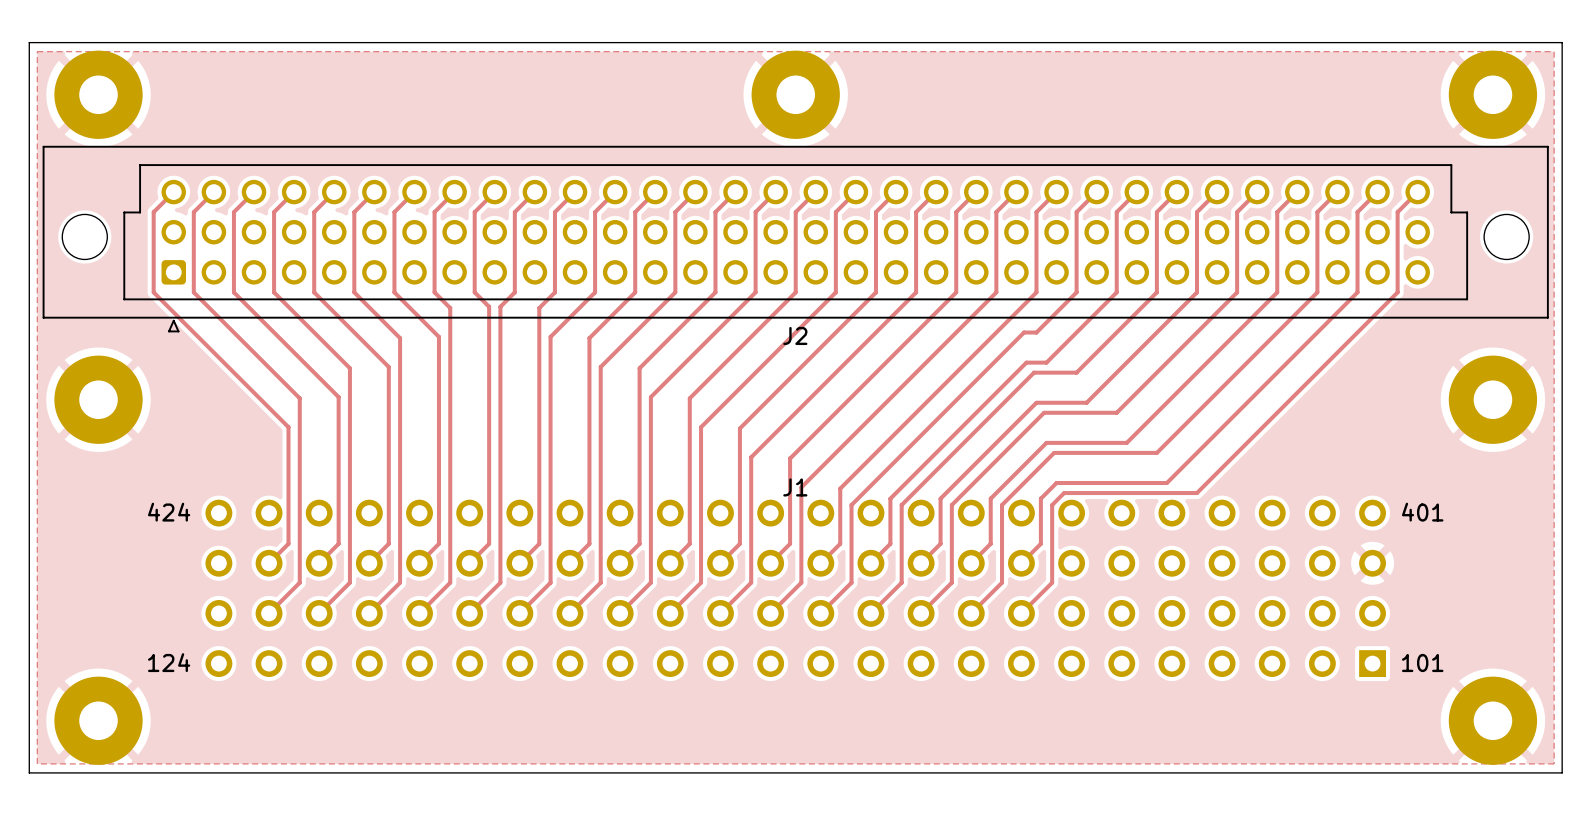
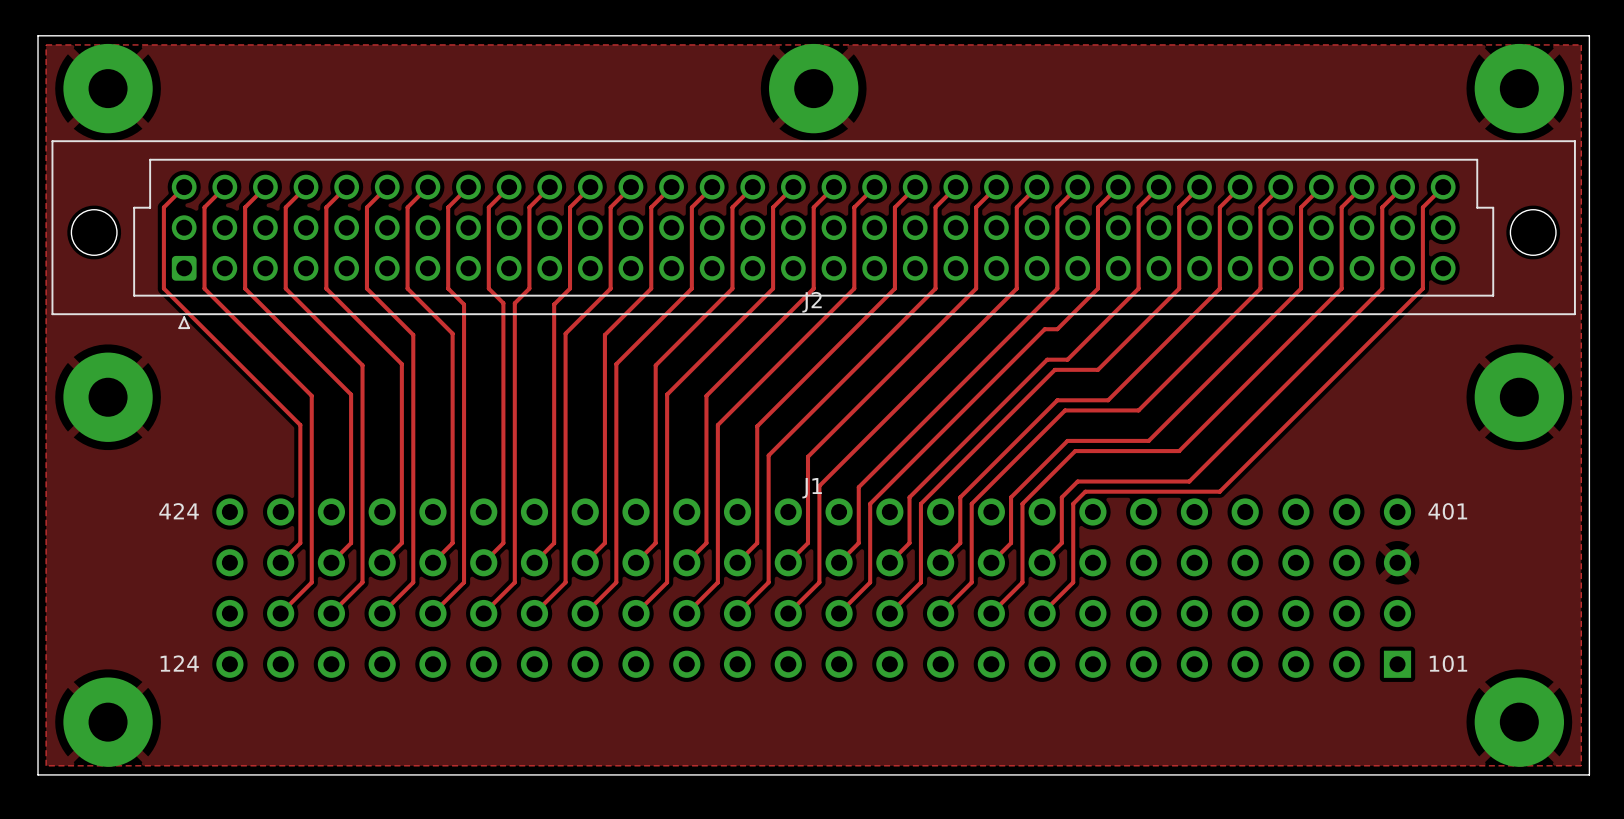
J2 name position: J2 (795, 335) -> J2 (812, 302)

